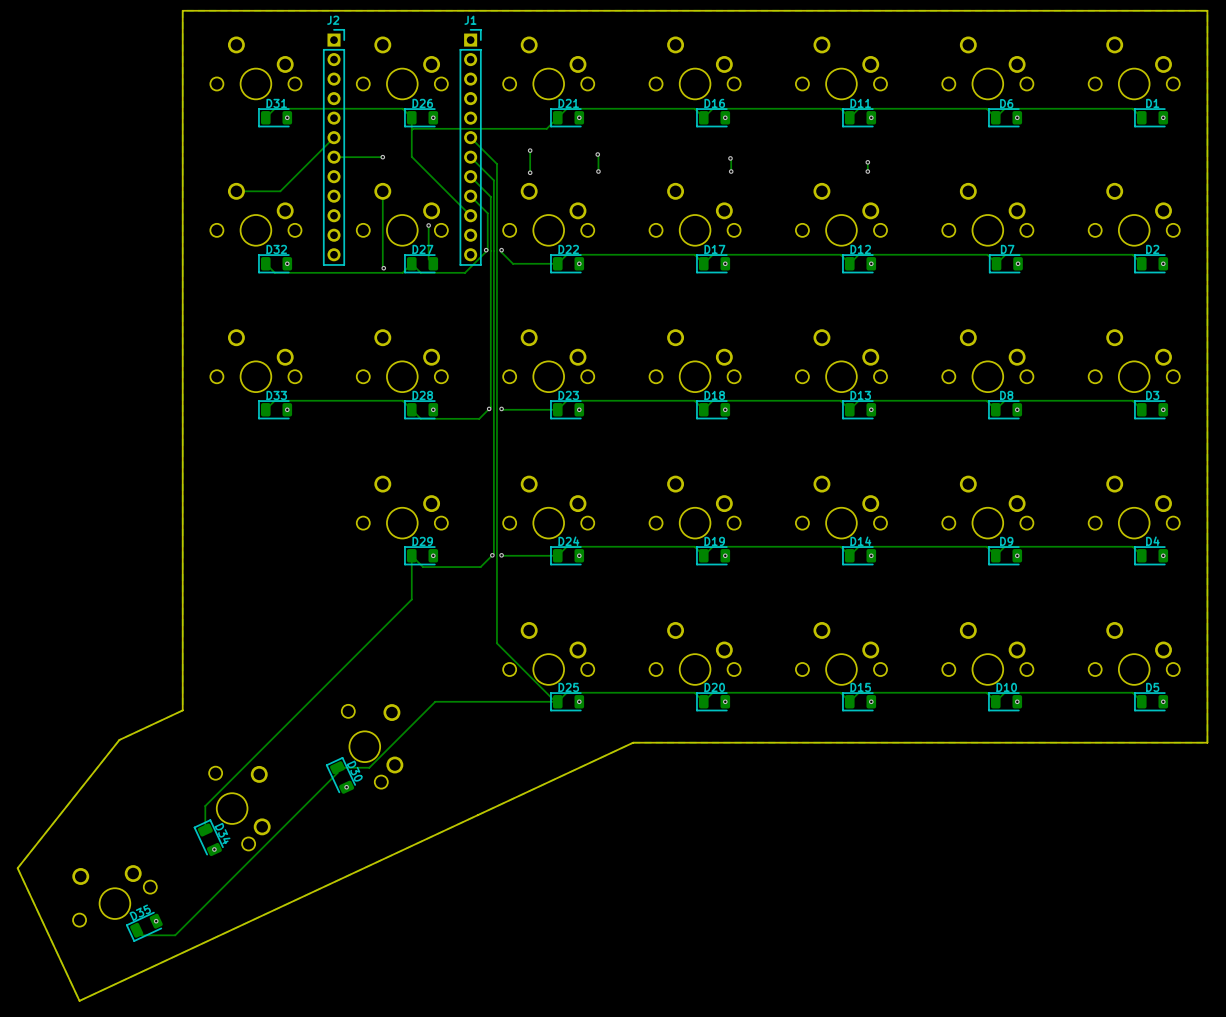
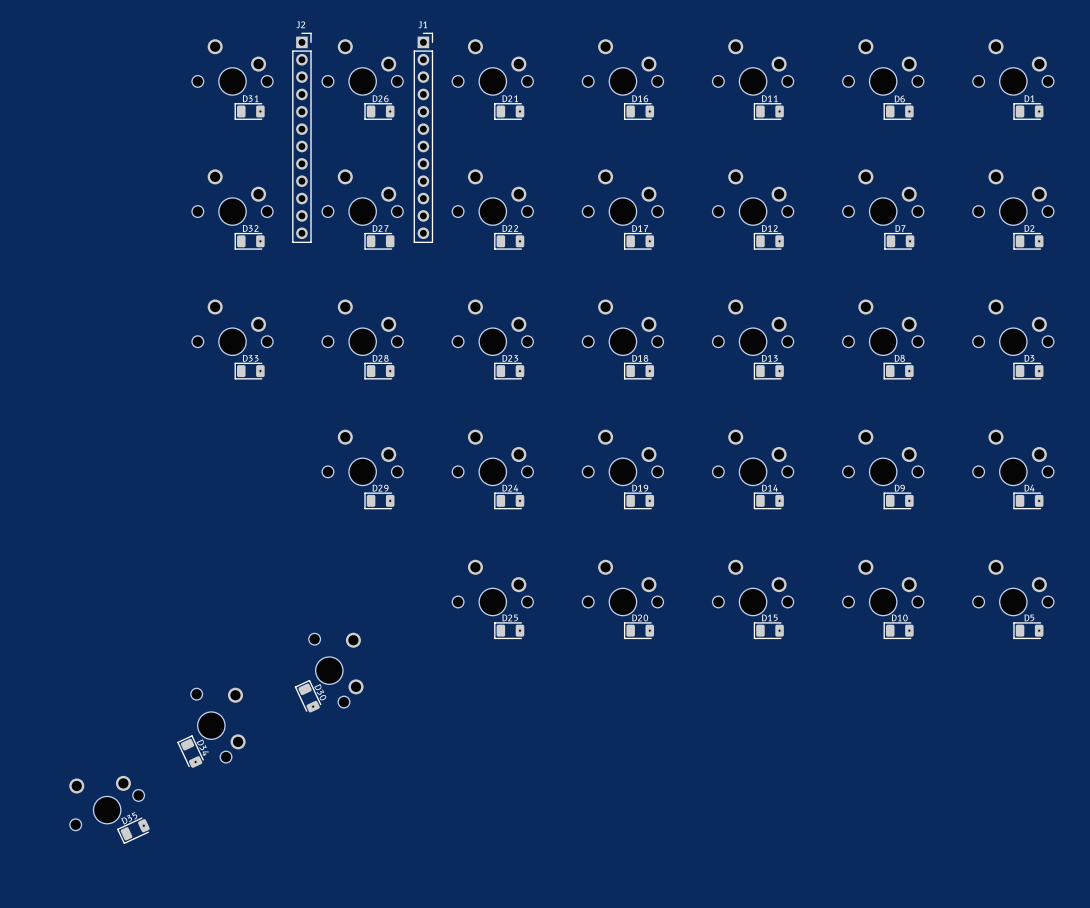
board edge: (1207, 10) (1207, 742) (633, 742) (79, 1000) (17, 868) (119, 740) (182, 710) (182, 10) (1207, 10) -> none
track: (265, 117) (274, 108) (402, 108) (411, 117) (411, 156) (470, 215) -> none
track: (1141, 117) (1132, 108) (1004, 108) (995, 117) (986, 108) (858, 108) (849, 117) (840, 108) (712, 108) (703, 117) (694, 108) (566, 108) (546, 128) (411, 129) -> none
track: (334, 137) (280, 191) (236, 191) -> none
track: (470, 137) (496, 164) (496, 643) (555, 701) -> none
track: (530, 150) (530, 172) -> none
via: (530, 150) -> none
track: (597, 154) (598, 171) -> none
via: (597, 154) -> none
track: (382, 157) (334, 157) -> none
via: (382, 157) -> none
track: (470, 157) (493, 180) (493, 553) (480, 567) (423, 567) (411, 555) (411, 599) (205, 806) (205, 830) -> none
track: (730, 158) (731, 171) -> none
via: (730, 158) -> none
track: (867, 162) (867, 171) -> none
via: (867, 162) -> none
via: (598, 171) -> none
via: (731, 171) -> none
via: (867, 171) -> none
via: (530, 172) -> none
track: (470, 176) (490, 196) (490, 407) (479, 418) (420, 418) (402, 400) (274, 400) (265, 409) -> none
track: (382, 191) (383, 268) -> none
track: (470, 196) (487, 213) (487, 250) -> none
track: (428, 225) (428, 259) (433, 263) -> none
via: (428, 225) -> none
via: (486, 250) -> none
track: (487, 250) (465, 272) (420, 272) (411, 263) (402, 272) (274, 272) (265, 263) -> none
track: (501, 250) (512, 263) (557, 263) (566, 254) (694, 254) (703, 263) (712, 254) (840, 254) (849, 263) (858, 254) (987, 254) (996, 263) (1005, 254) (1132, 254) (1141, 263) -> none
via: (501, 250) -> none
via: (383, 268) -> none
via: (489, 408) -> none
track: (501, 408) (557, 409) (566, 400) (694, 400) (703, 409) (712, 400) (840, 400) (849, 409) (858, 400) (986, 400) (995, 409) (1004, 400) (1132, 400) (1141, 409) -> none
via: (501, 408) -> none
via: (492, 555) -> none
track: (501, 555) (557, 555) (566, 546) (694, 546) (703, 555) (712, 546) (840, 546) (849, 555) (858, 546) (986, 546) (995, 555) (1004, 546) (1132, 546) (1141, 555) -> none
via: (501, 555) -> none
track: (1141, 701) (1132, 692) (1004, 692) (995, 701) (986, 692) (858, 692) (849, 701) (840, 692) (712, 692) (703, 701) (694, 692) (566, 692) (557, 701) (435, 701) (369, 767) (337, 767) (337, 773) (175, 935) (141, 935) (136, 930) -> none

